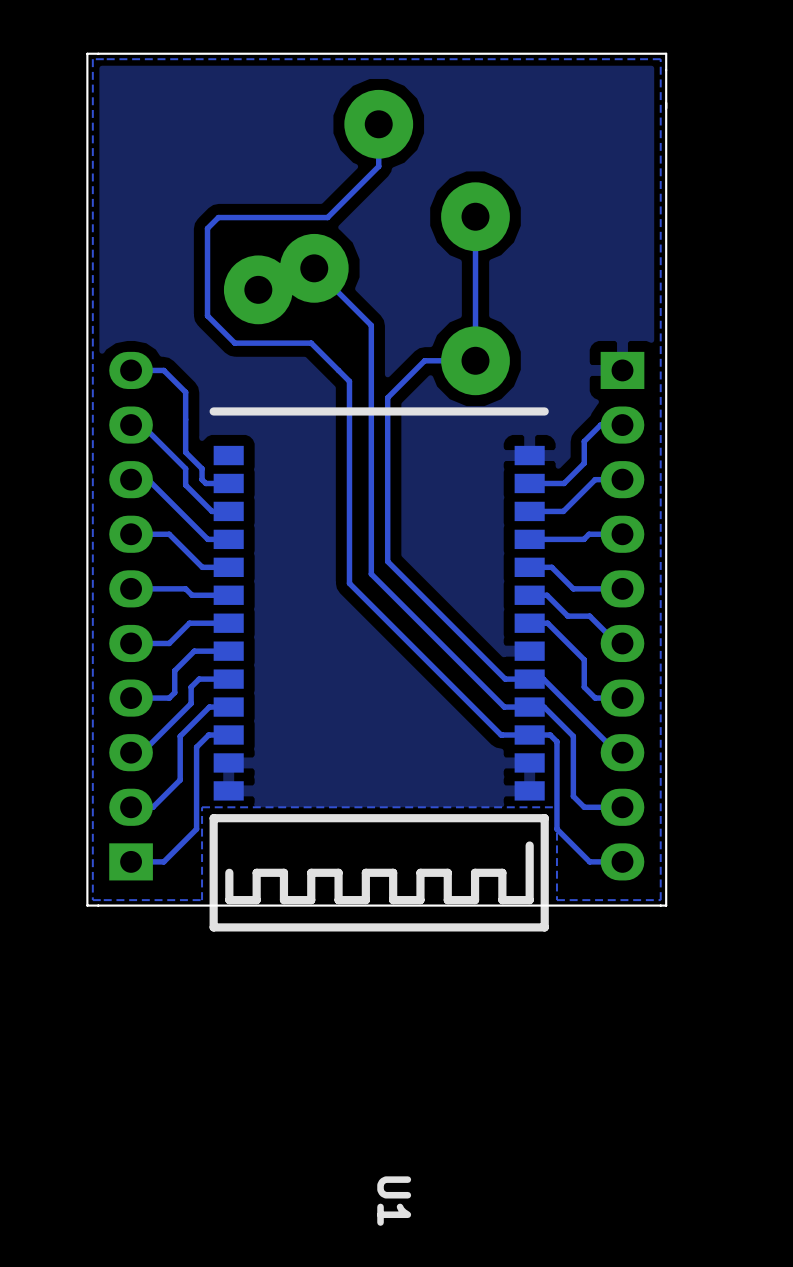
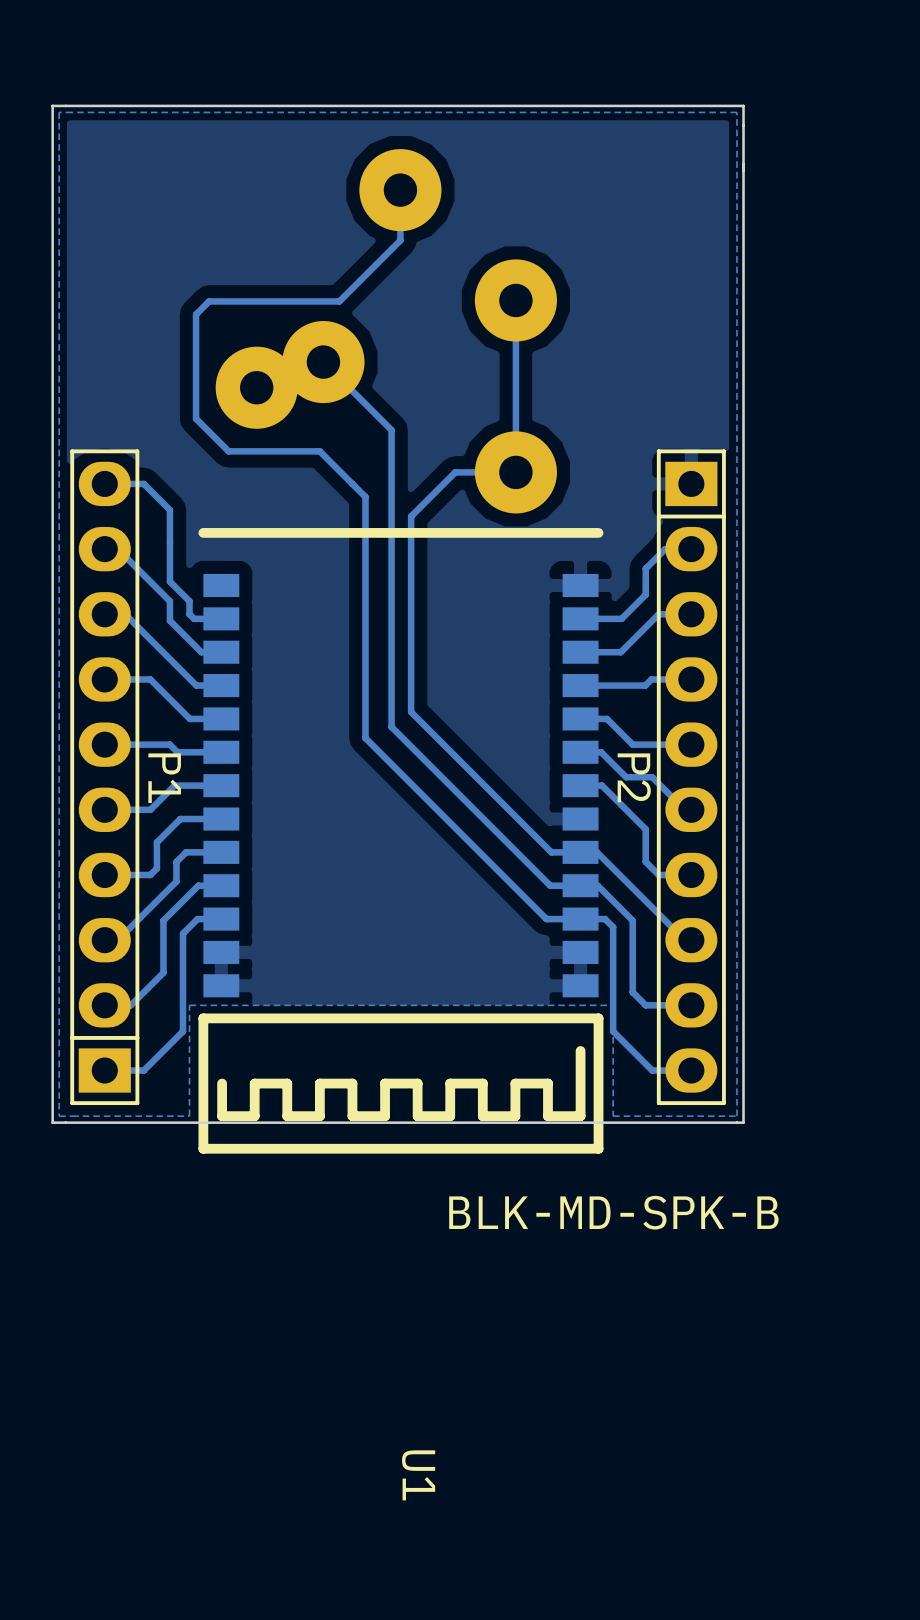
P1 side: top (131, 616) -> bottom (104, 777)
P2 side: top (622, 616) -> bottom (691, 777)
U1 value: none -> BLK-MD-SPK-B (613, 1212)

